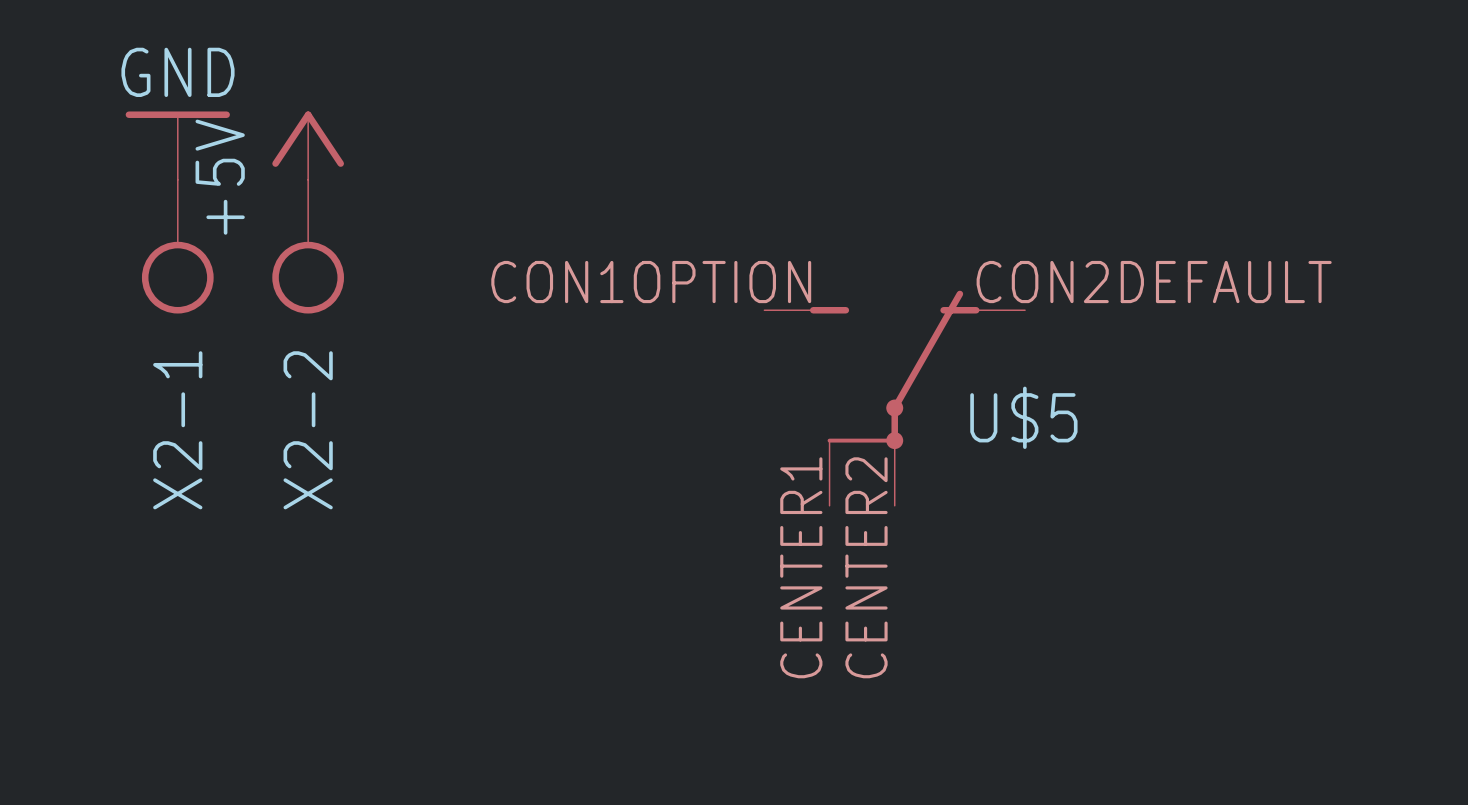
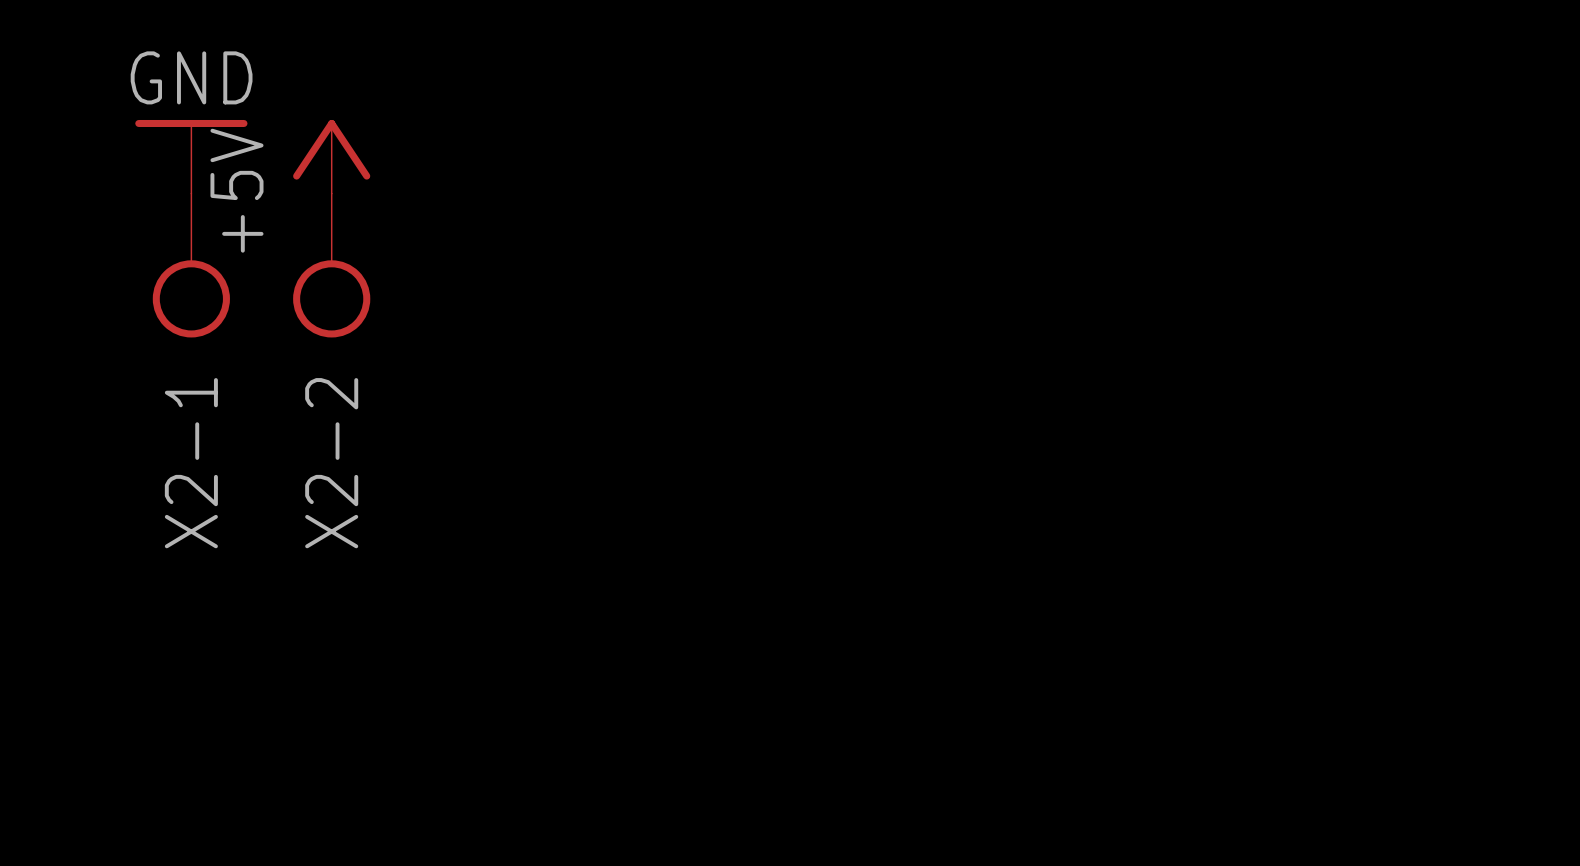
U$5: (894, 398) -> none

